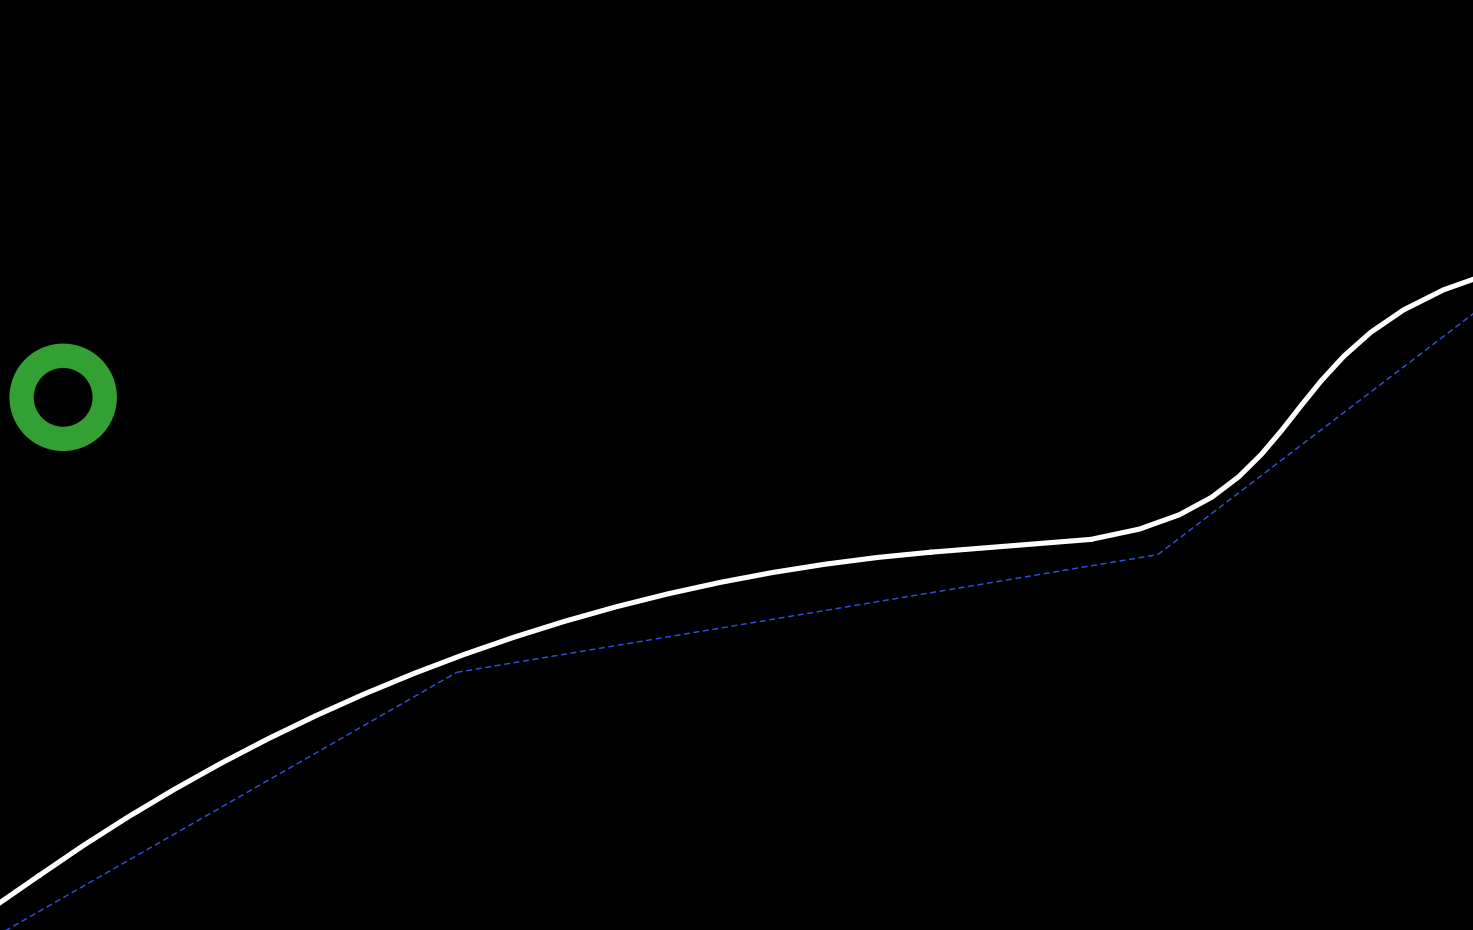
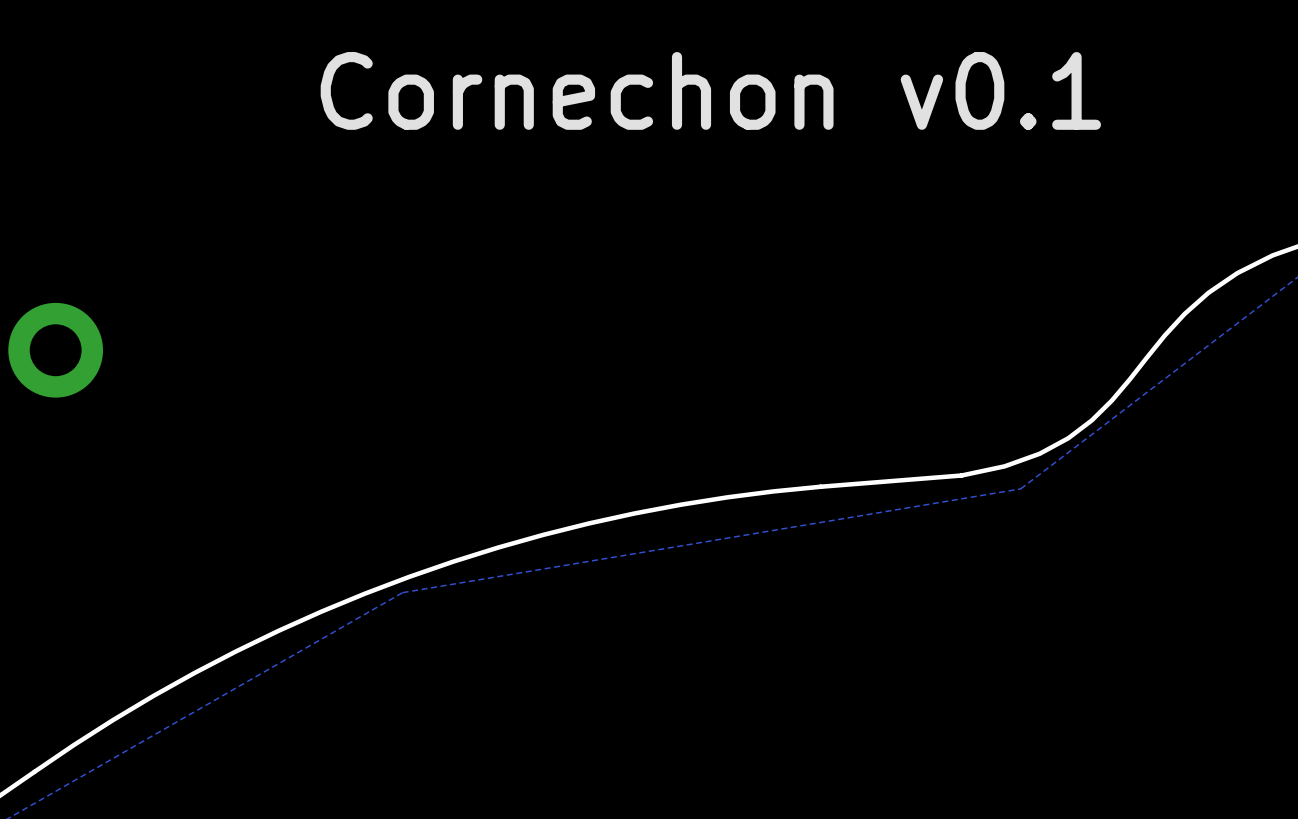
text: none -> Cornechon v0.1 (710, 90)

